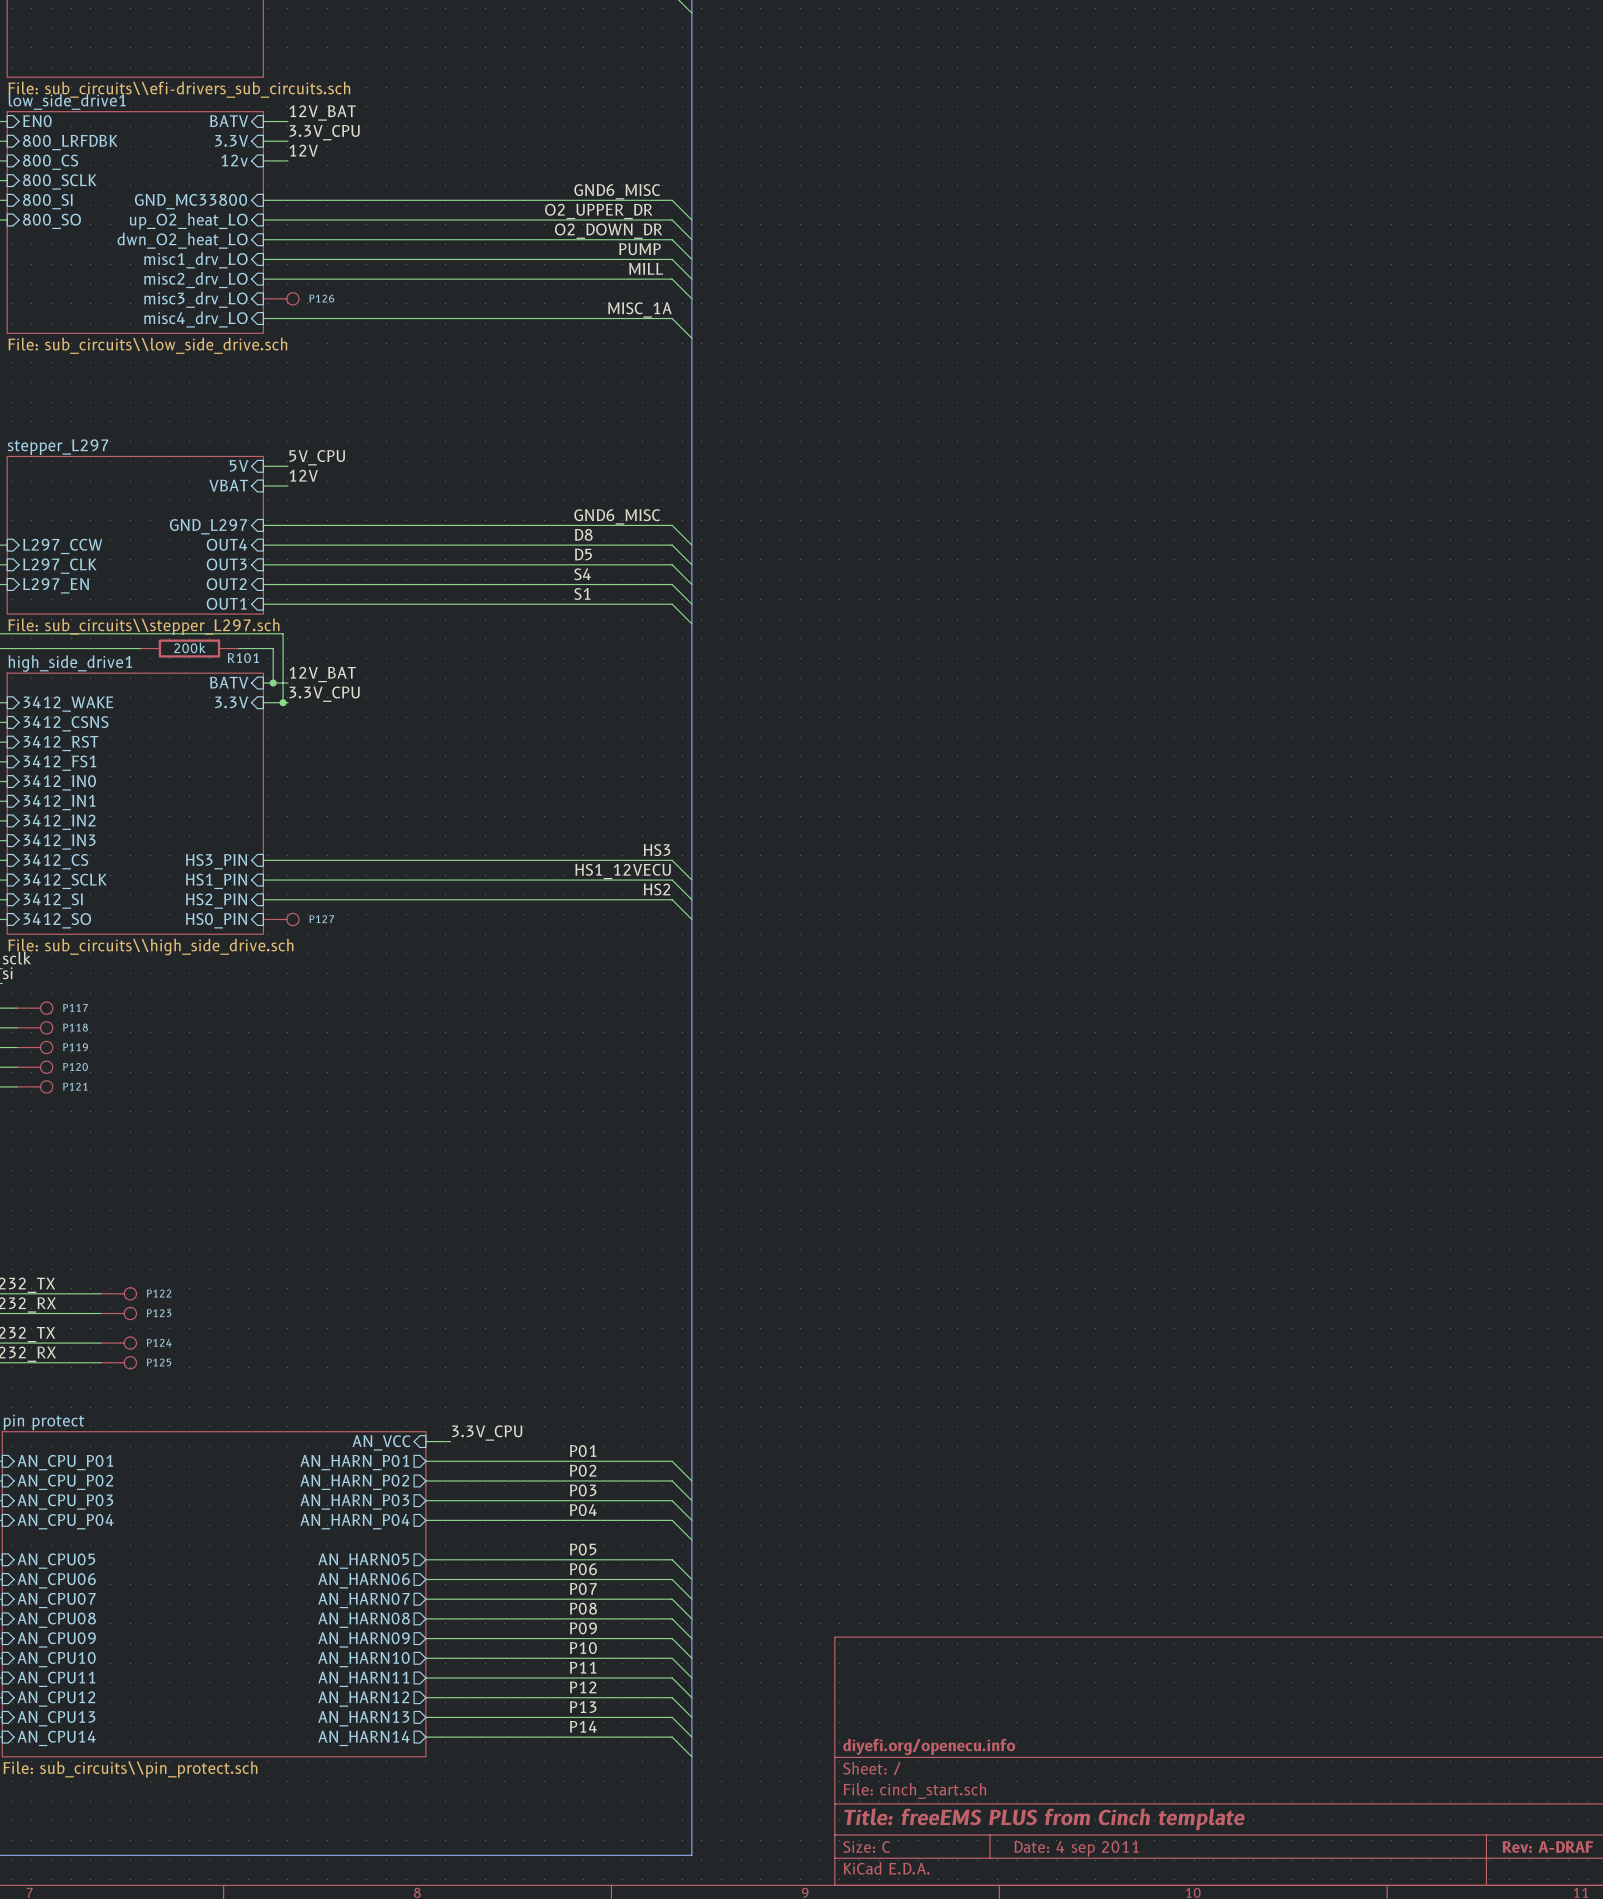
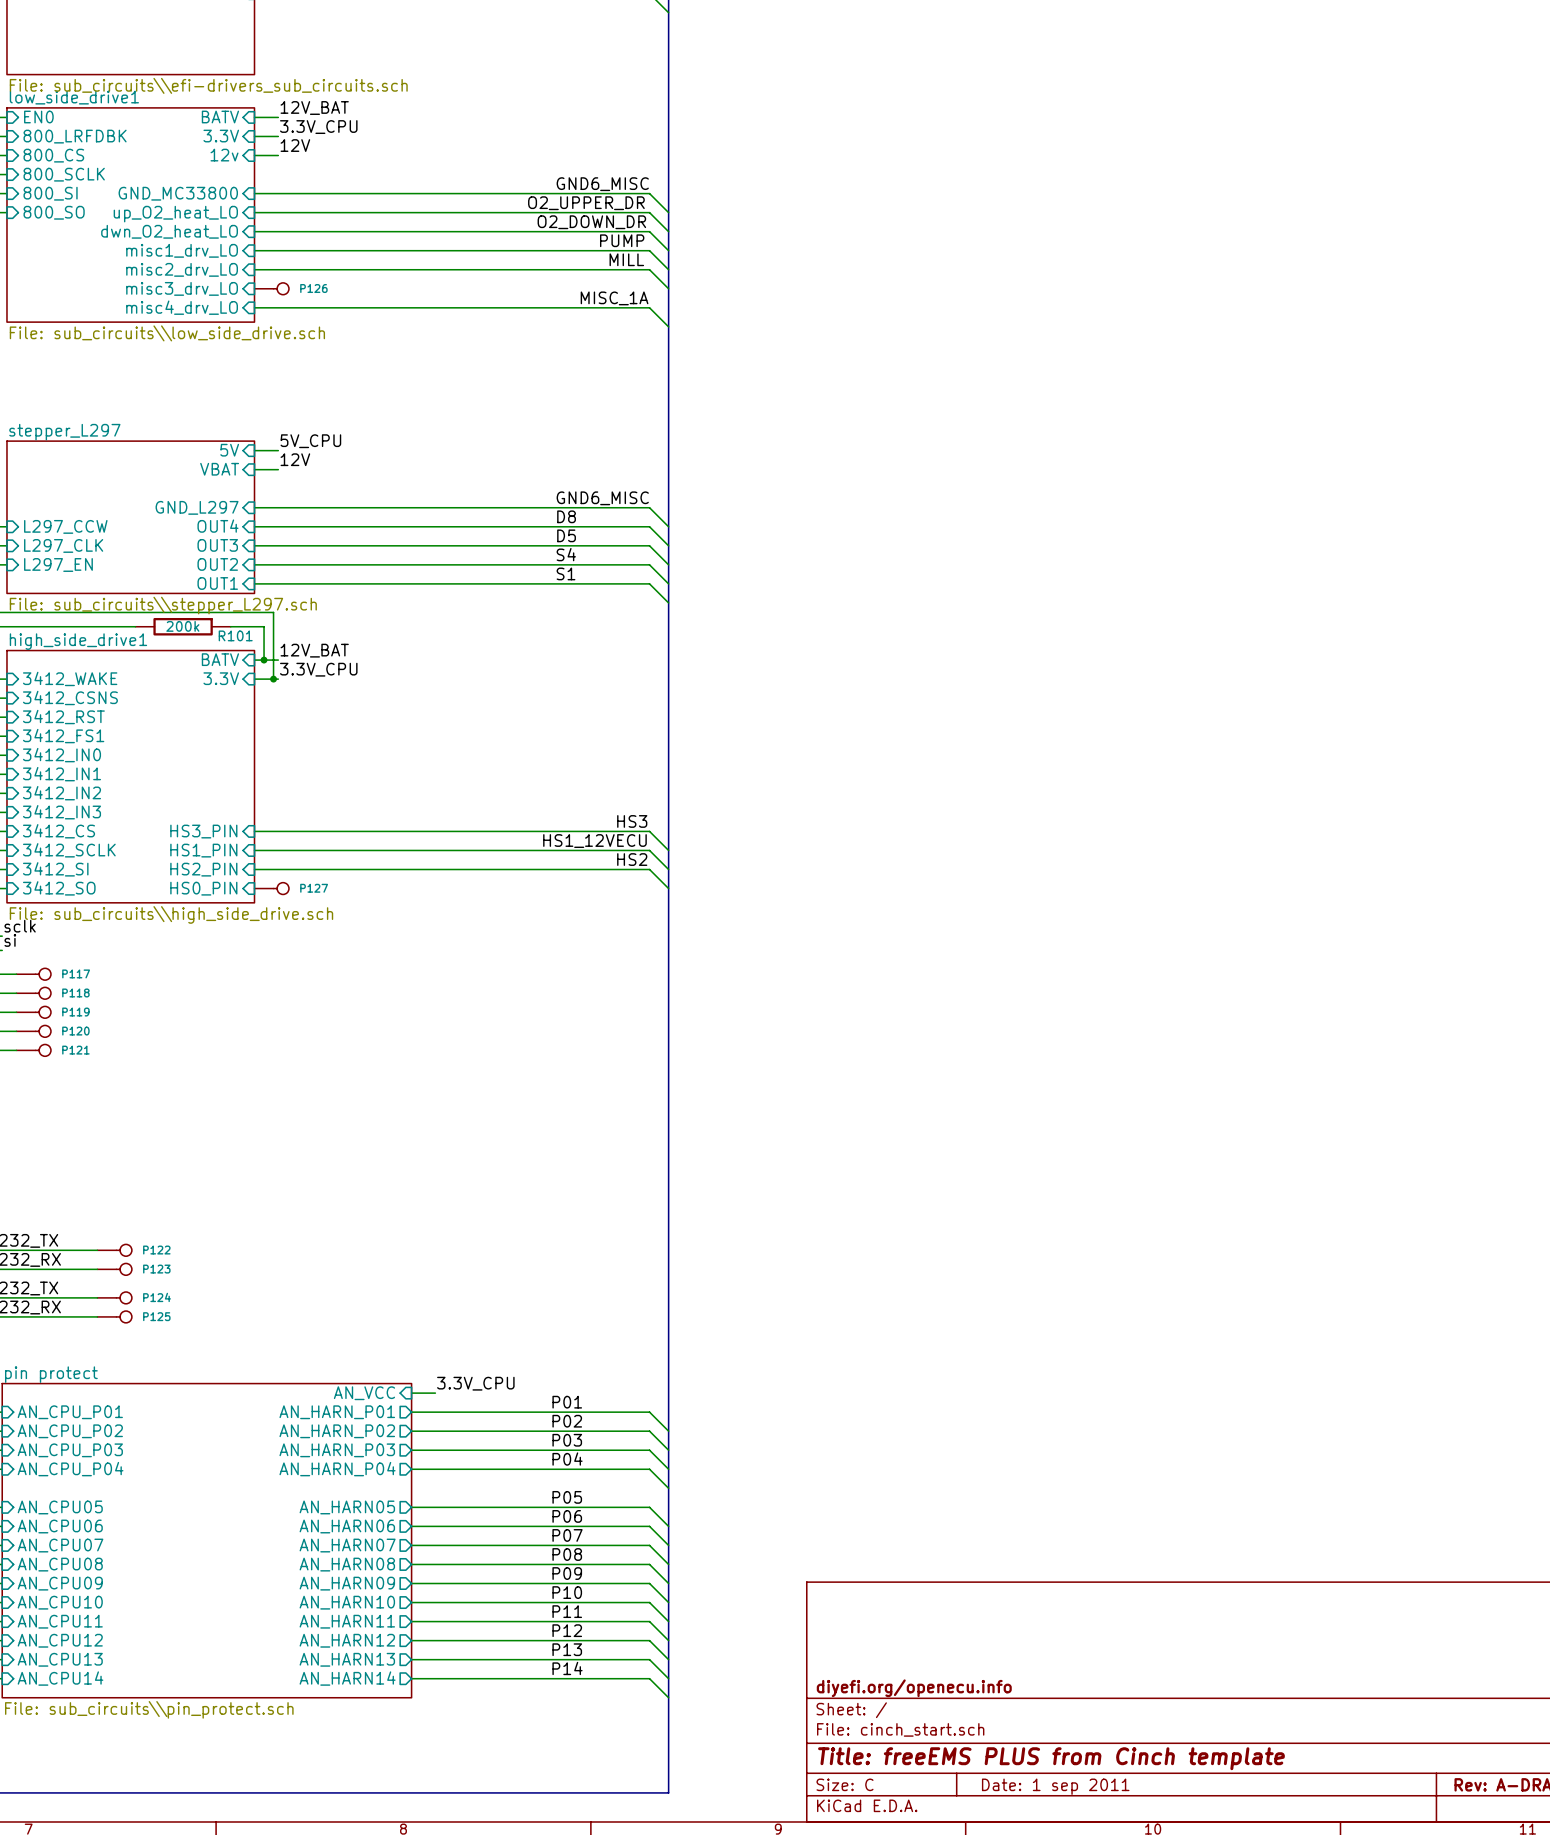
title block: Date: 4 sep 2011 (1076, 1848) -> Date: 1 sep 2011 (1055, 1786)

